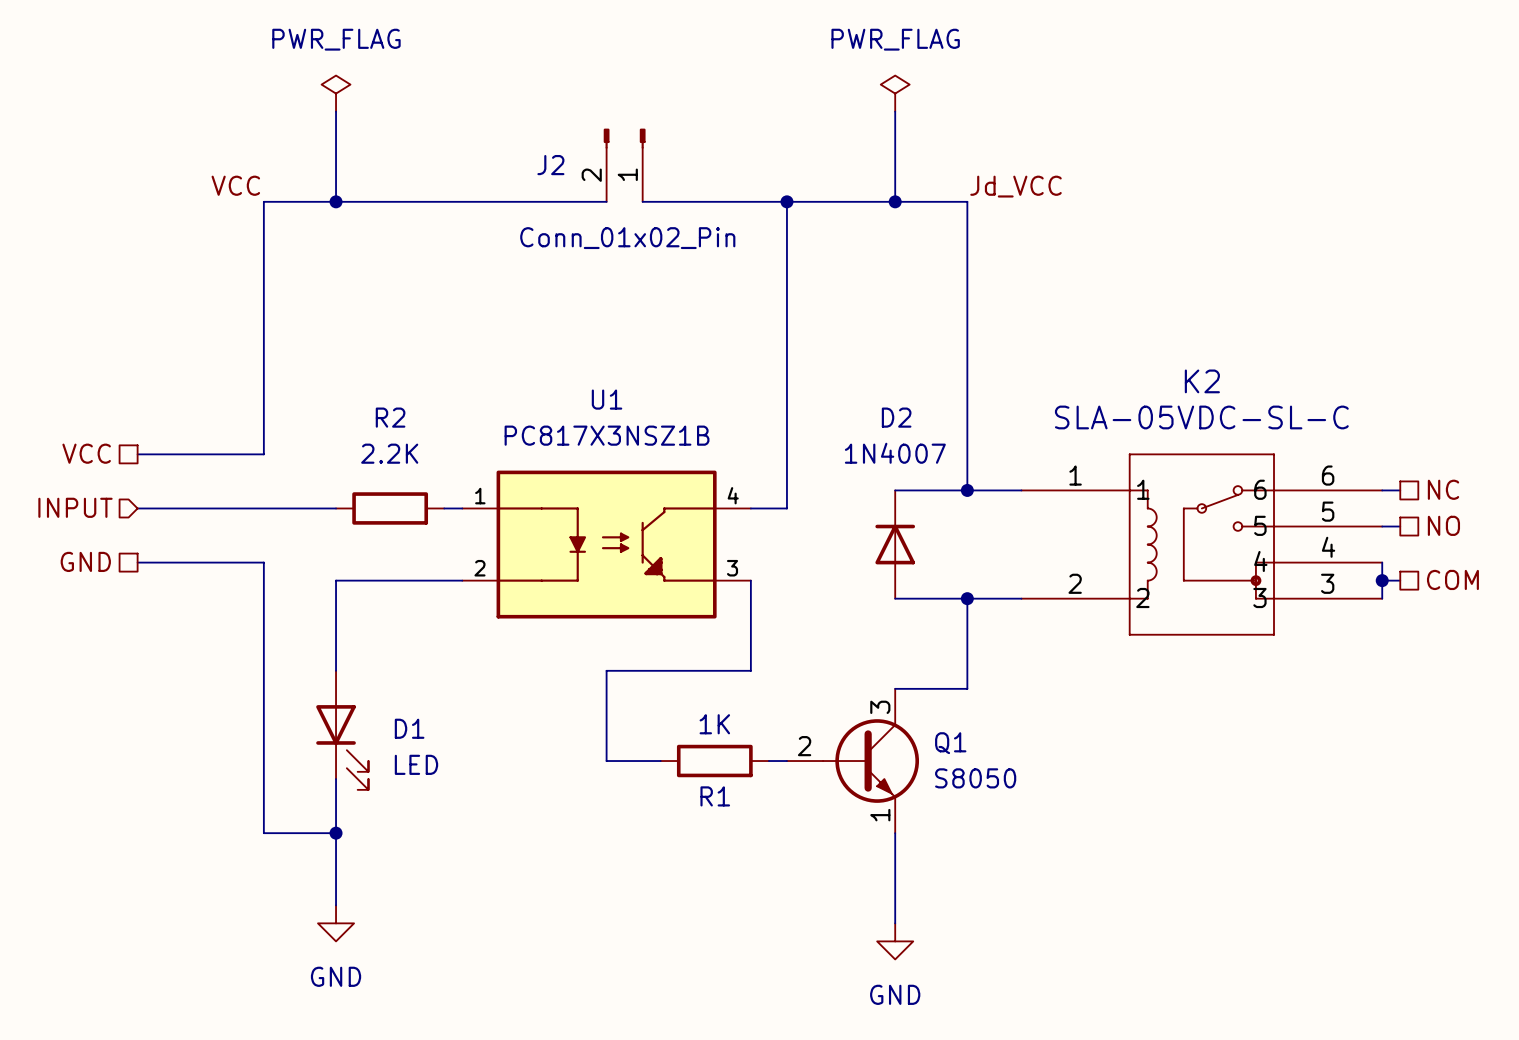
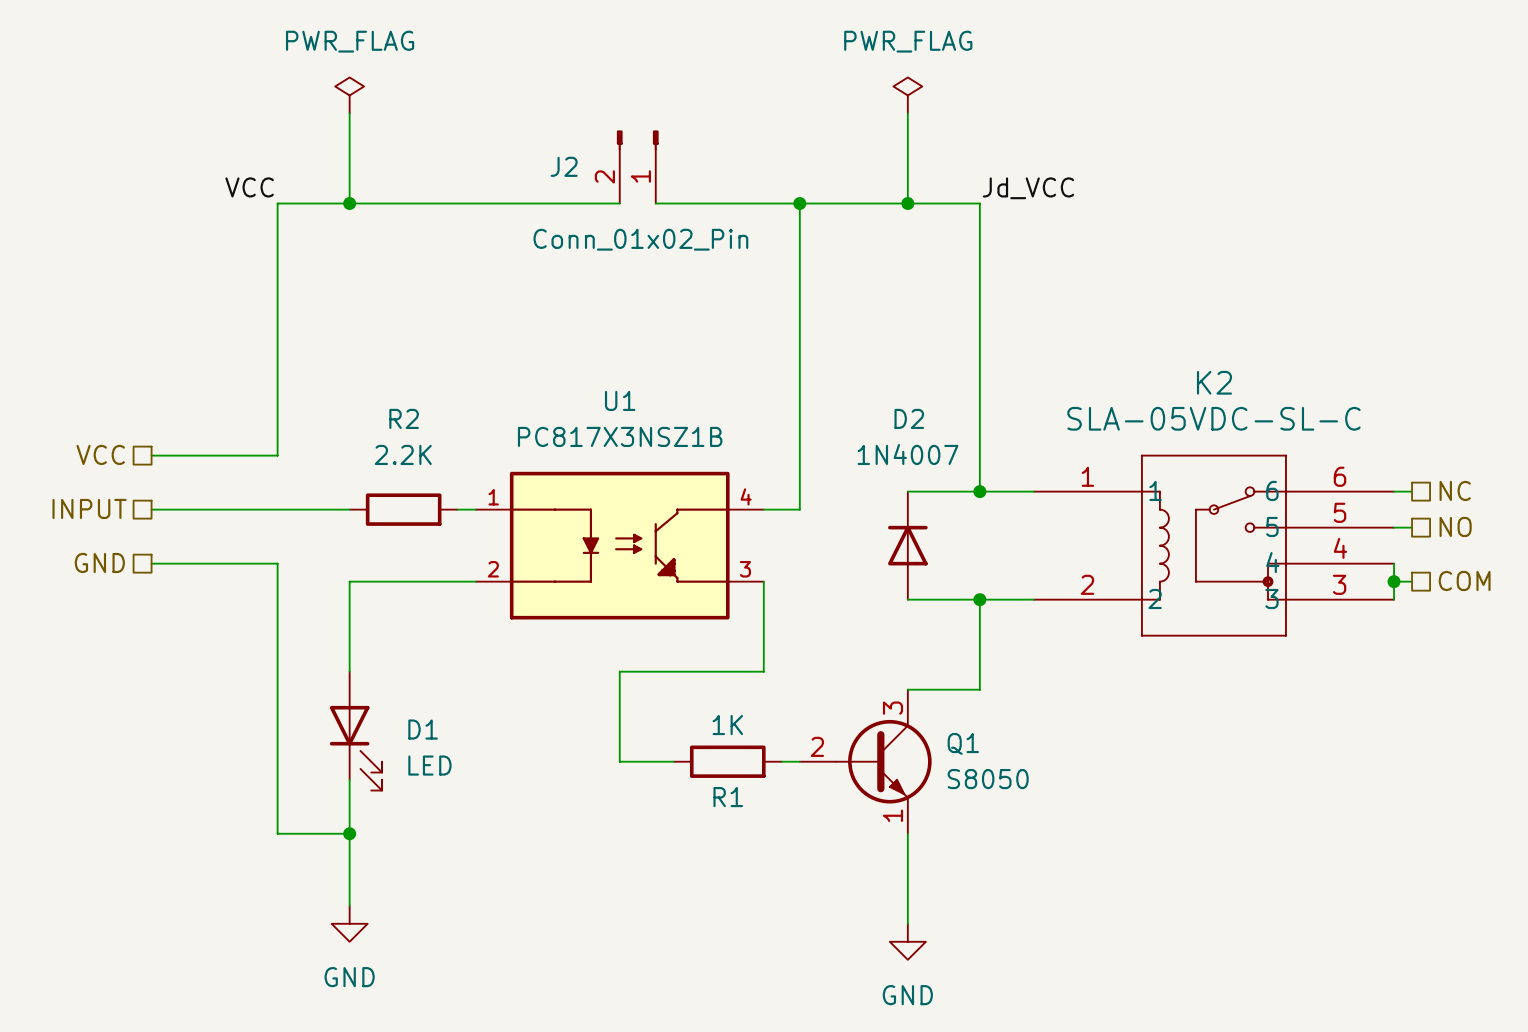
hierarchical label shape: input (75, 507) -> passive (89, 508)

